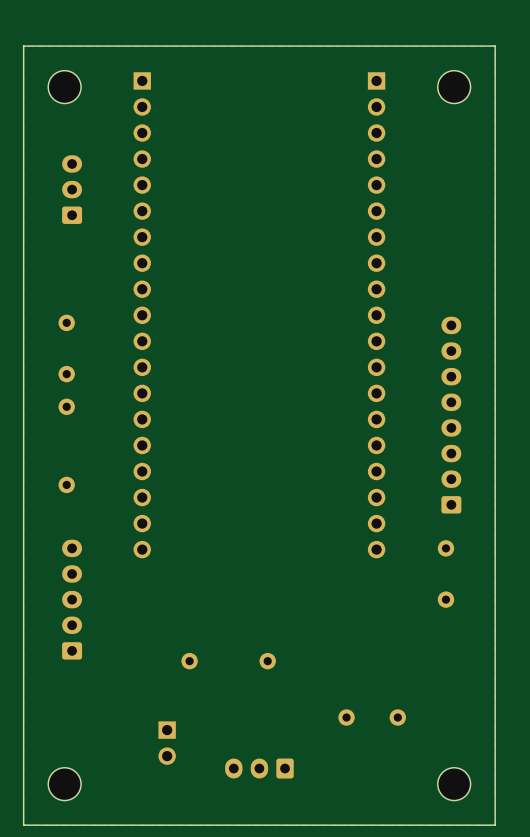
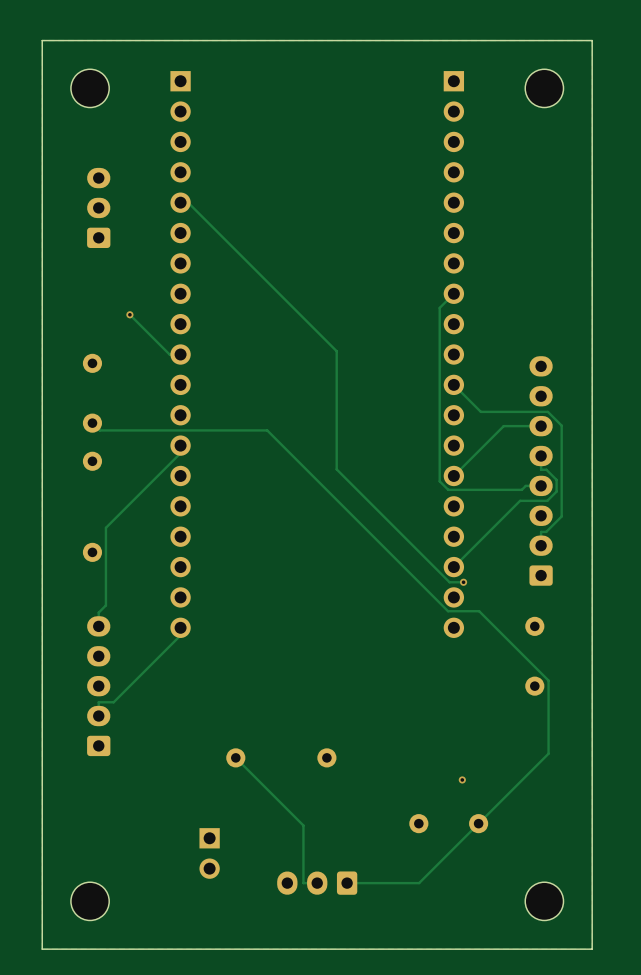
track: none -> (188, 202) (336, 351) (336, 469) (449, 582) (463, 582)
track: none -> (453, 293) (439, 307) (439, 481) (448, 489) (521, 489) (525, 485) (541, 485)
track: none -> (129, 314) (169, 354) (188, 354)
via: none -> (129, 314)
track: none -> (453, 384) (480, 411) (547, 411) (561, 425) (561, 516) (546, 531) (541, 531) (541, 545)
track: none -> (92, 423) (99, 430) (267, 430) (448, 611) (479, 611) (548, 680) (548, 753) (419, 883) (347, 883)
track: none -> (541, 426) (503, 426) (453, 475)
track: none -> (188, 445) (105, 527) (105, 605) (98, 612) (98, 626)
track: none -> (541, 456) (541, 469) (546, 469) (556, 479) (556, 491) (547, 500) (520, 500) (453, 567)
via: none -> (463, 582)
track: none -> (188, 627) (113, 702) (98, 702) (98, 716)
track: none -> (235, 757) (303, 825) (303, 883) (317, 883)
via: none -> (462, 779)

